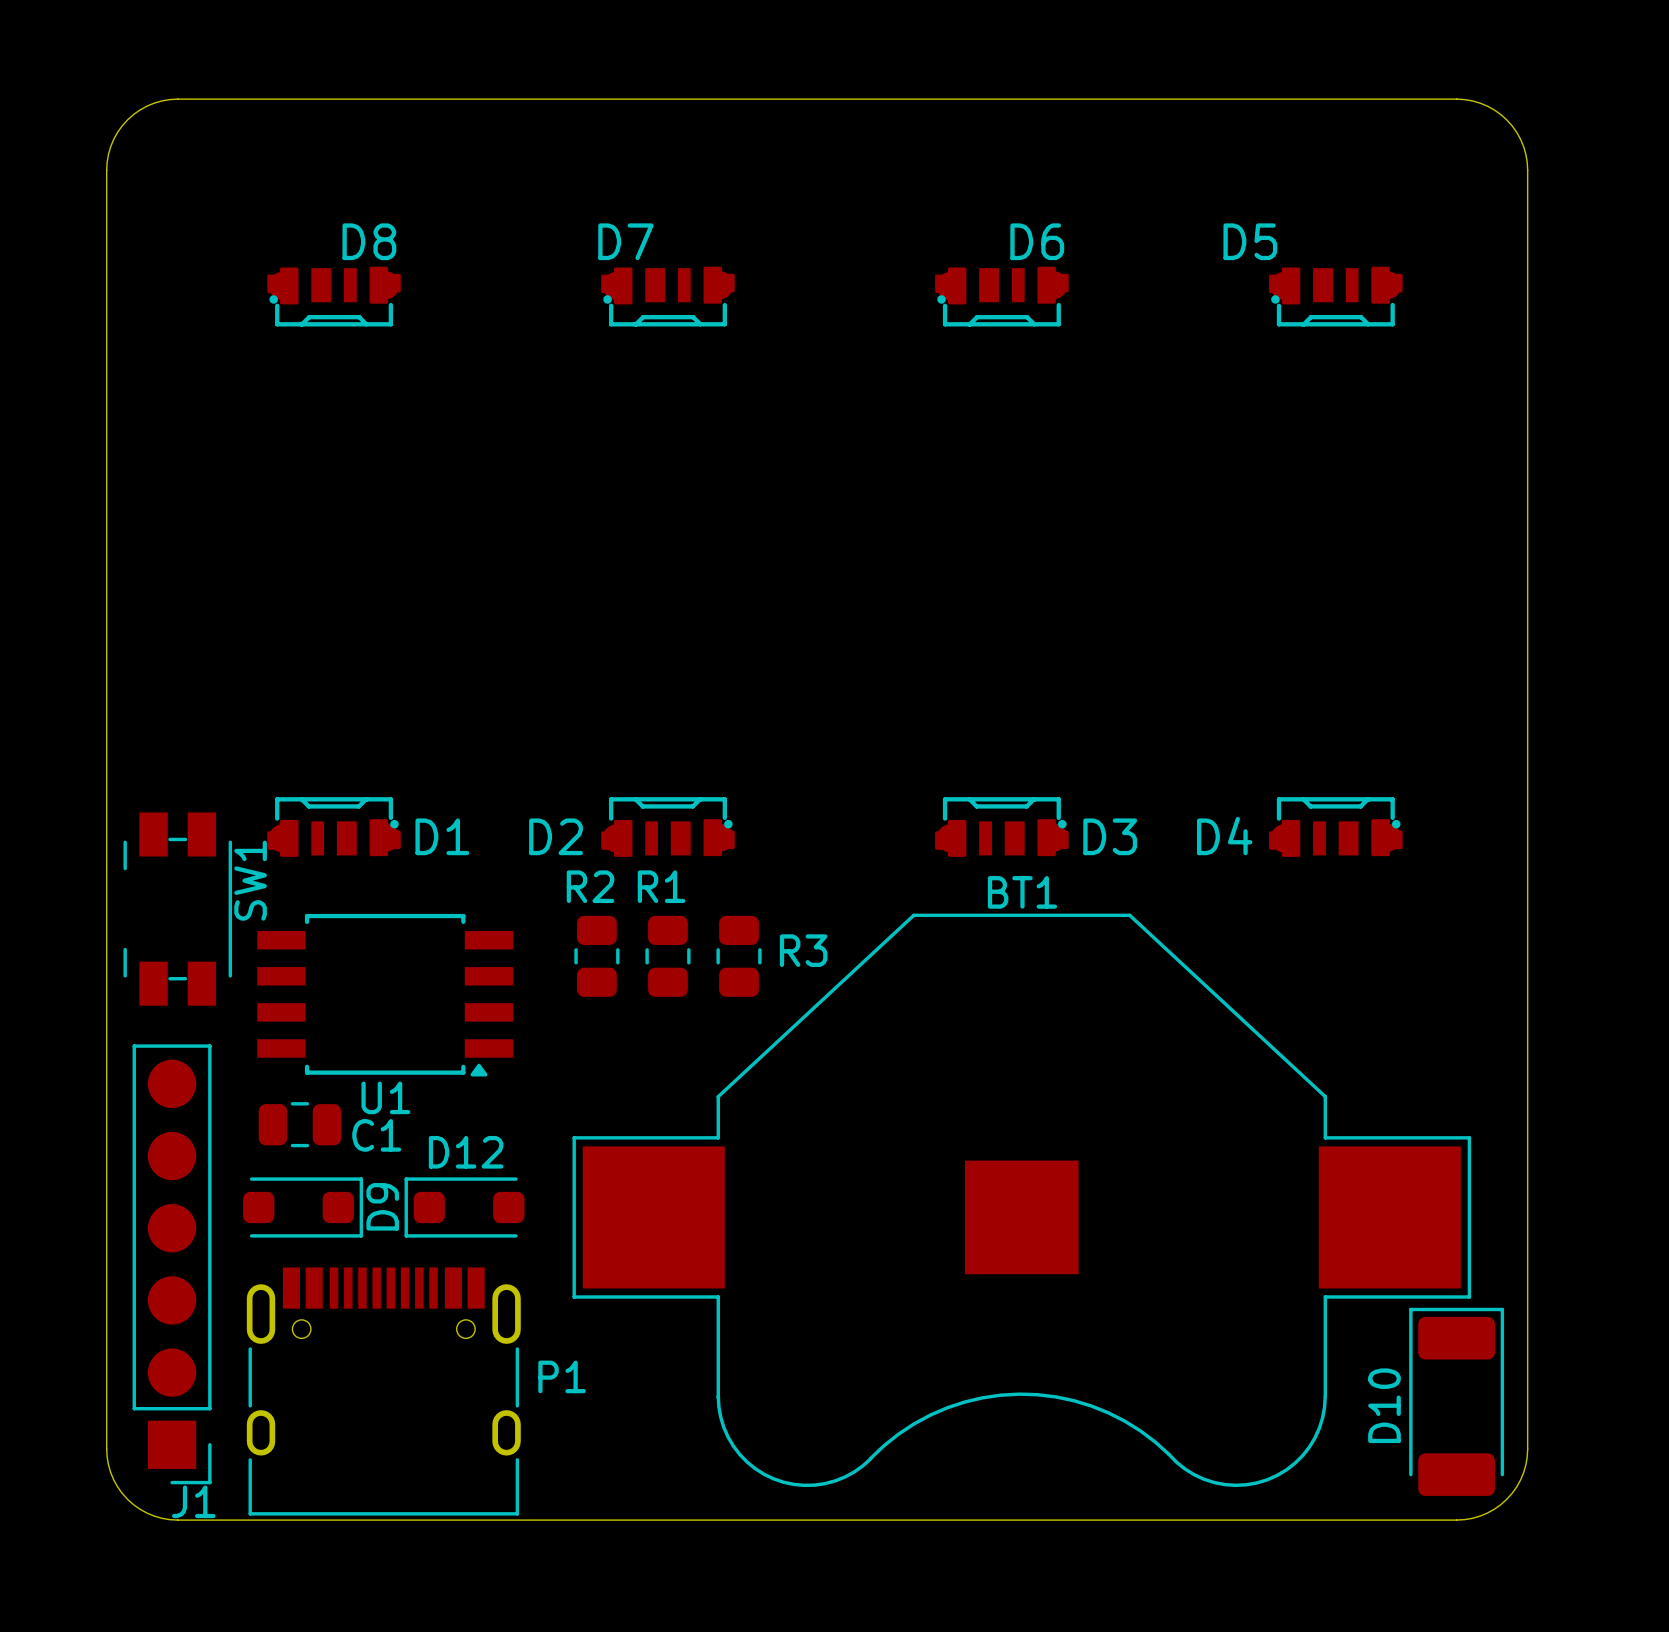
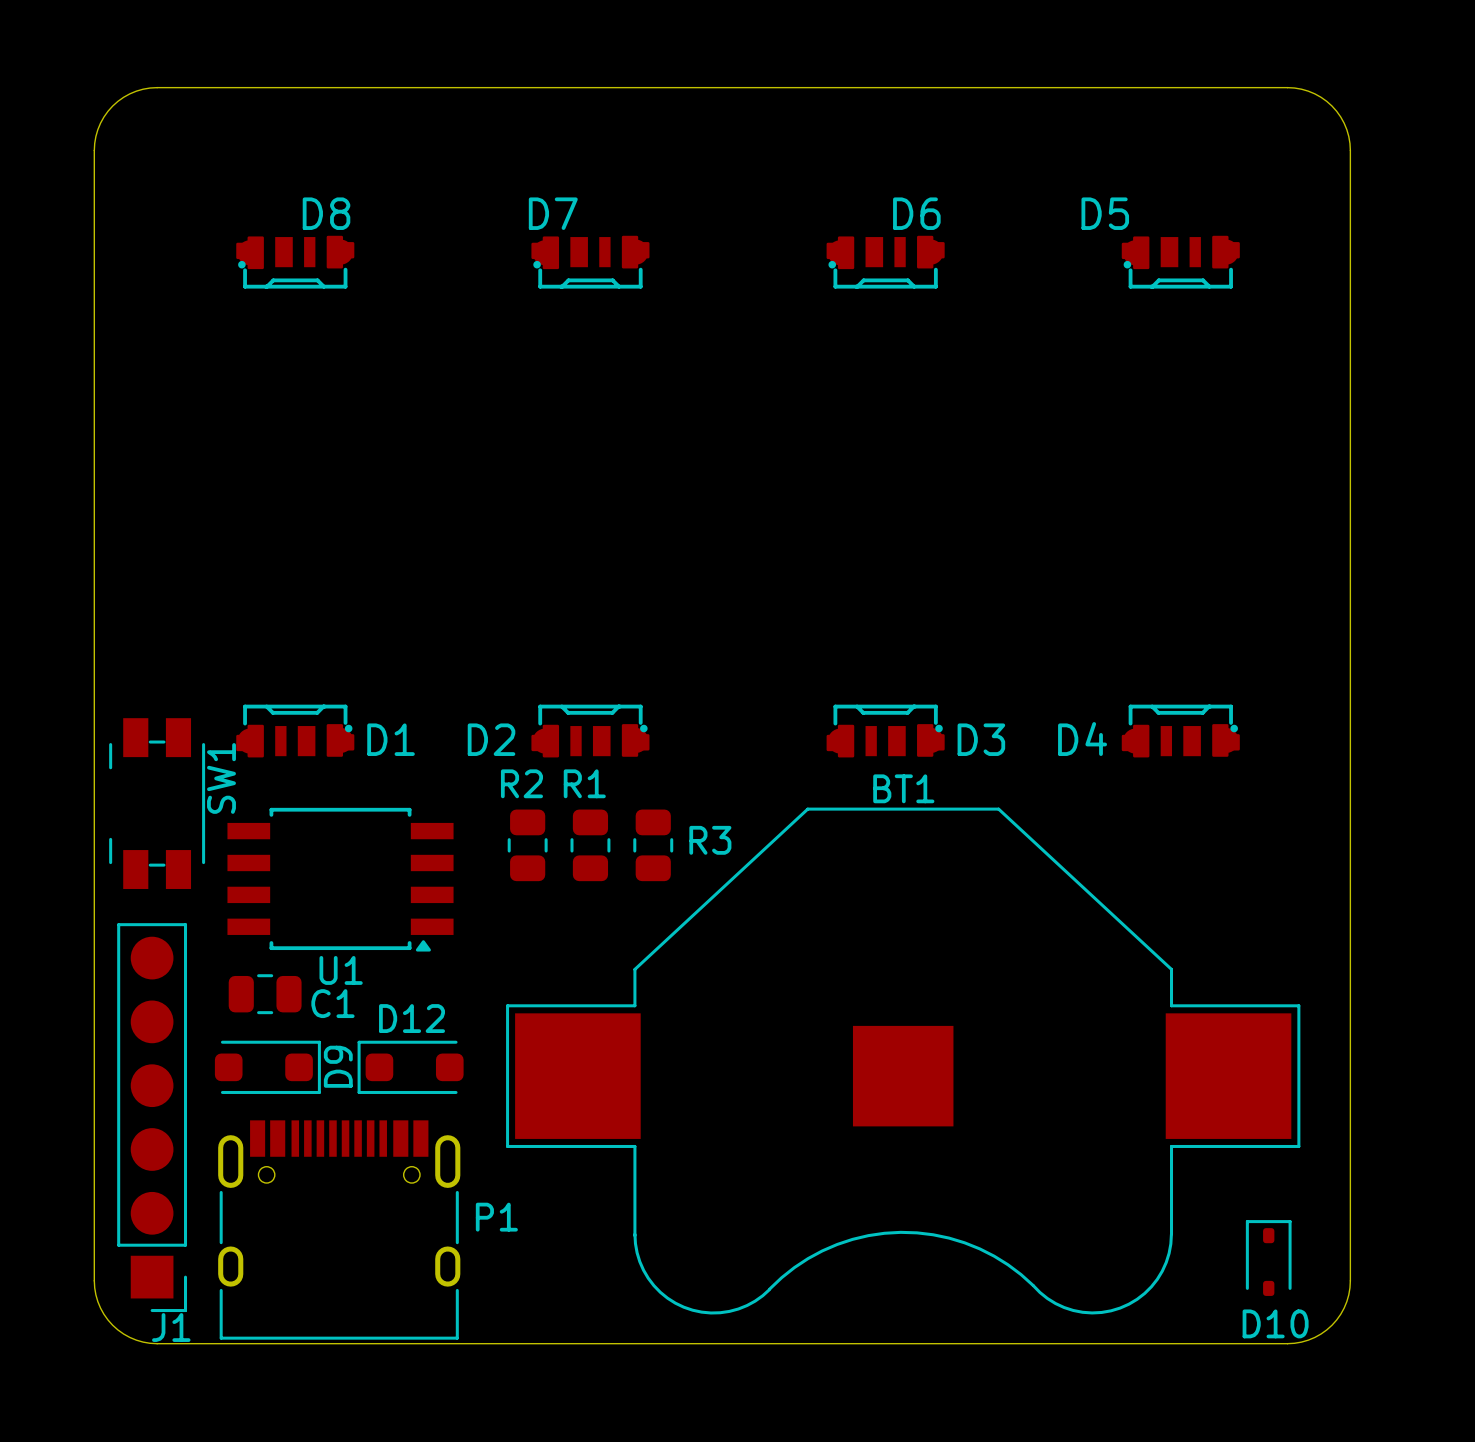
D10 footprint: [1409, 1307, 1505, 1496] -> [1245, 1220, 1292, 1296]
D10 name position: D10 (1384, 1405) -> D10 (1275, 1323)

